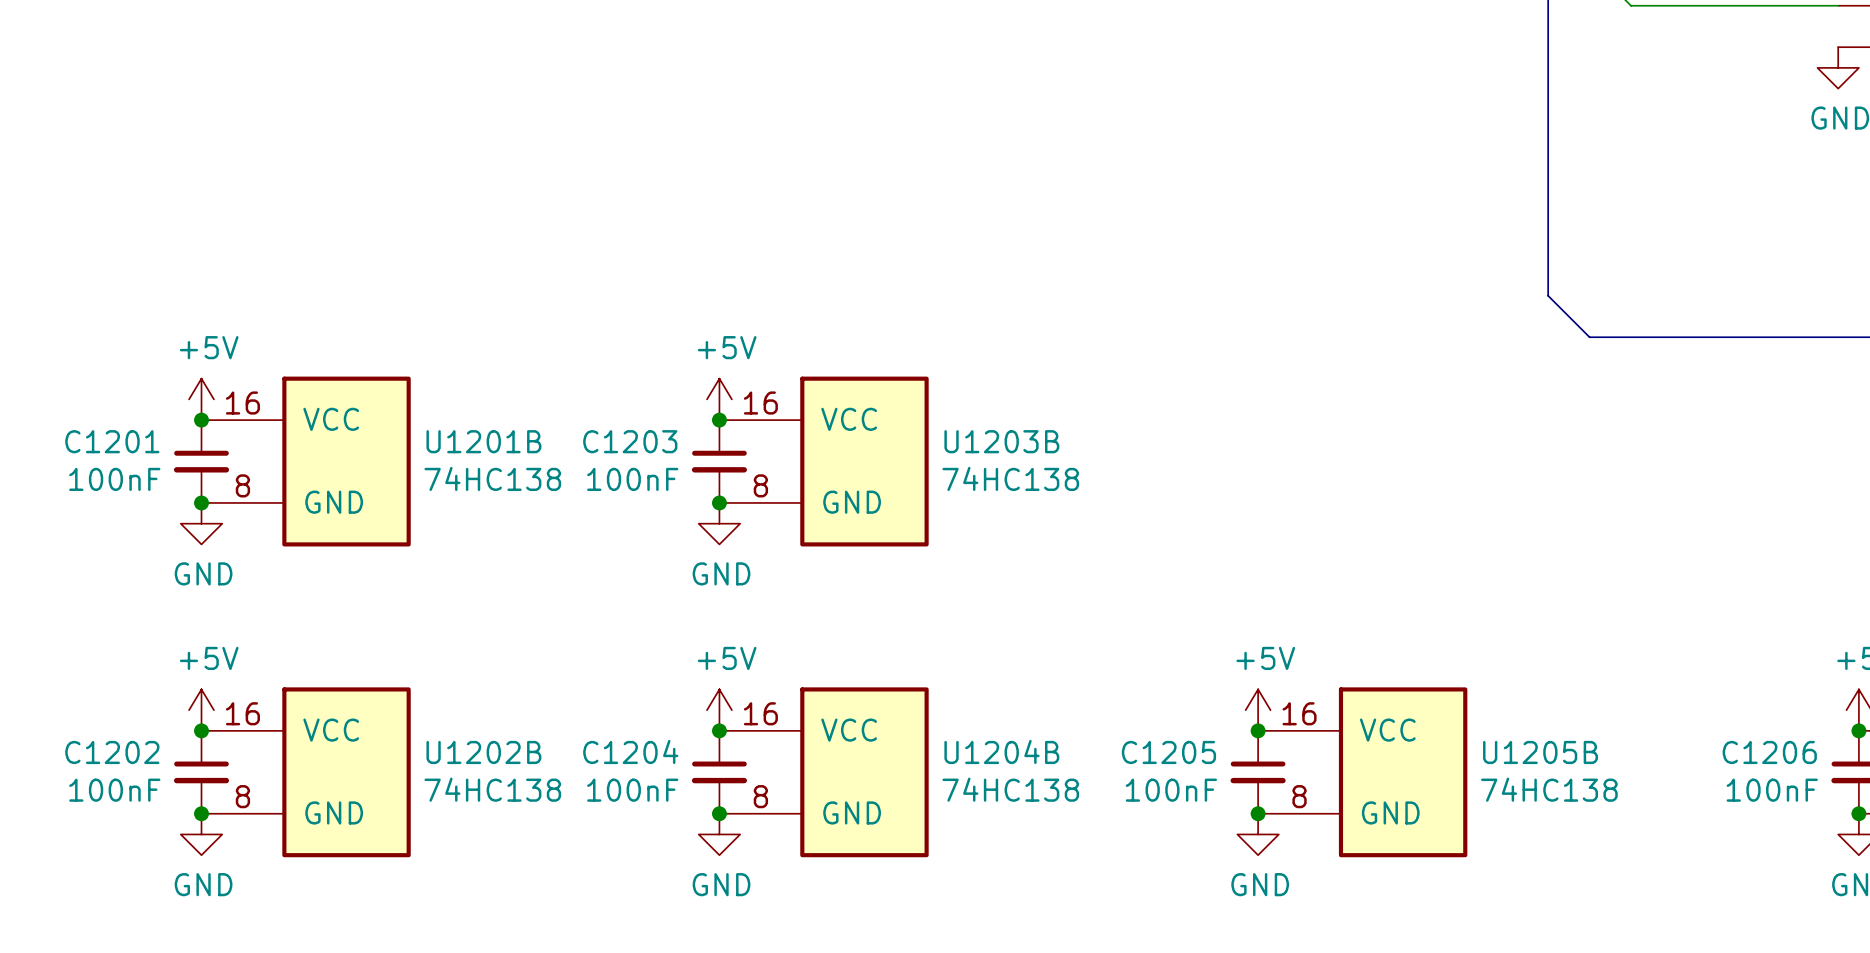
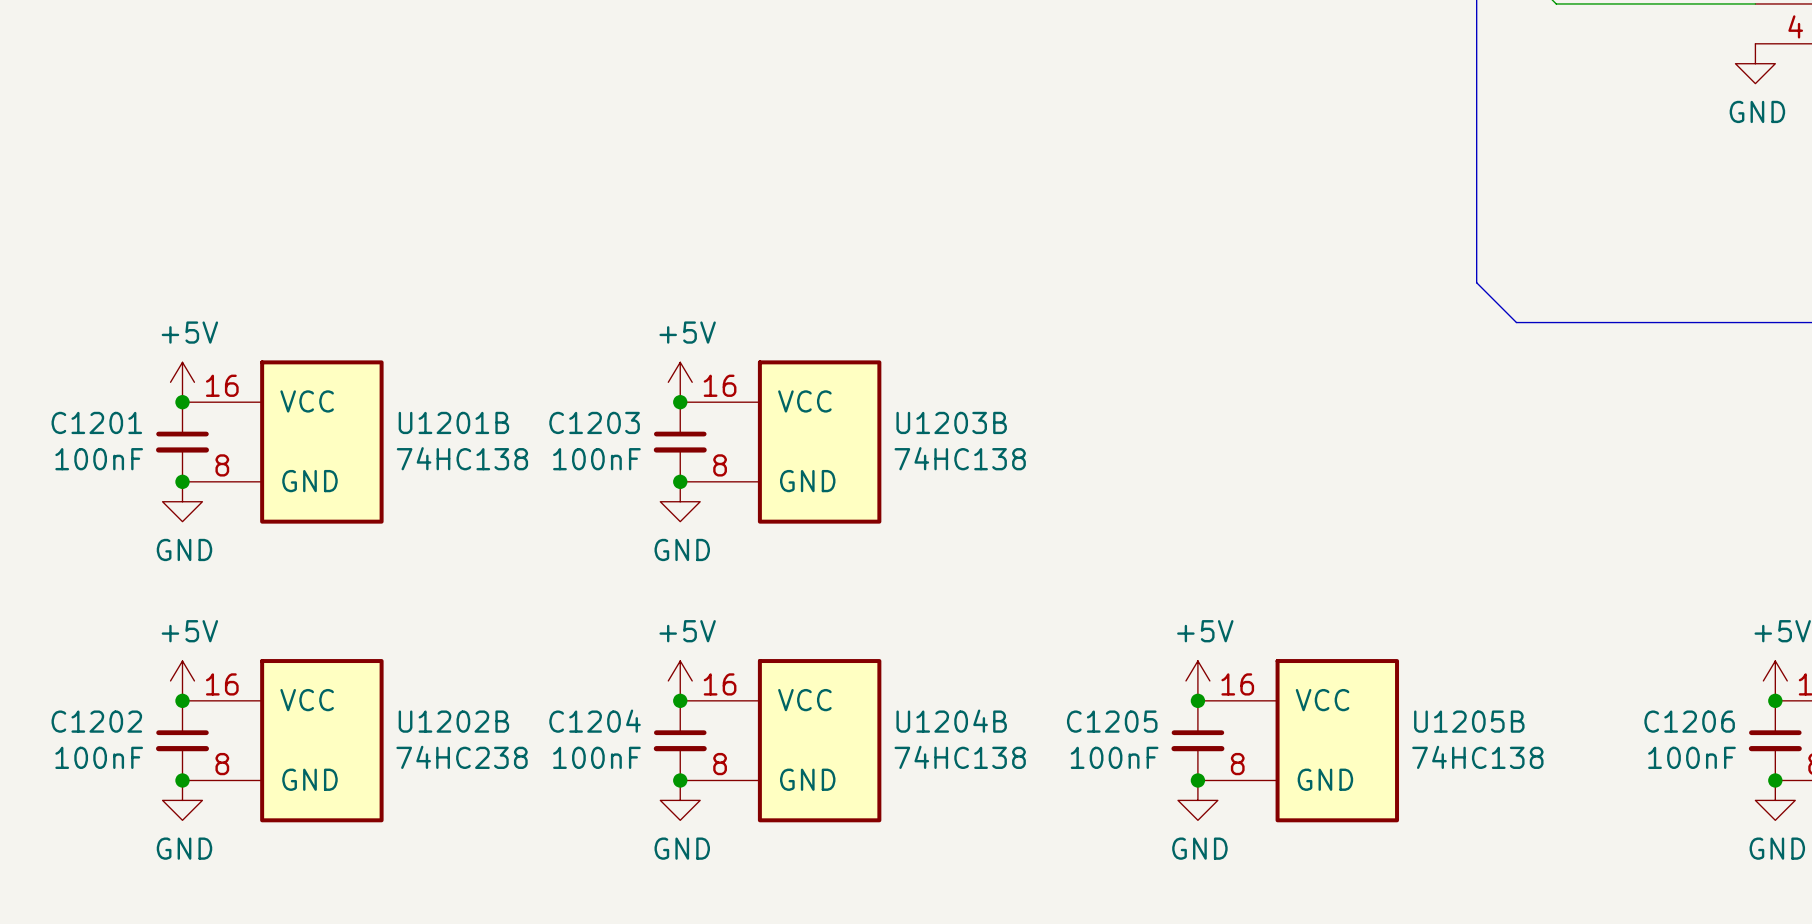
U1202B value: 74HC138 (492, 789) -> 74HC238 (462, 757)

